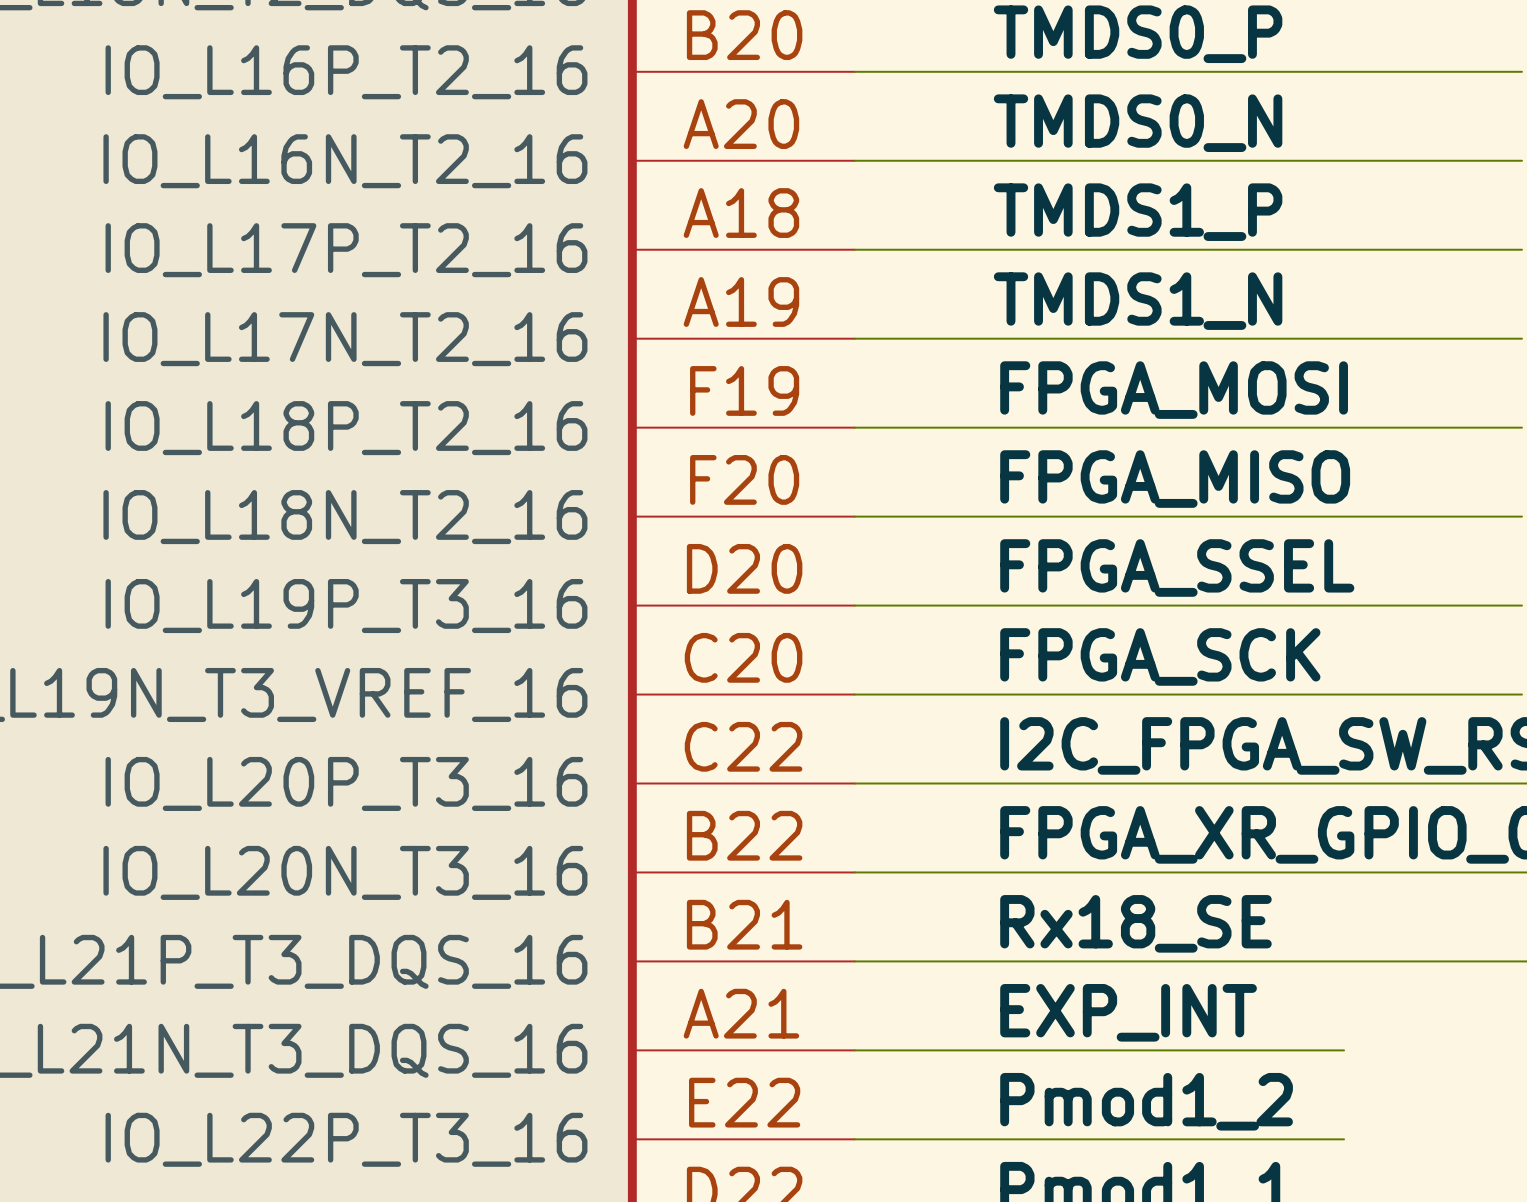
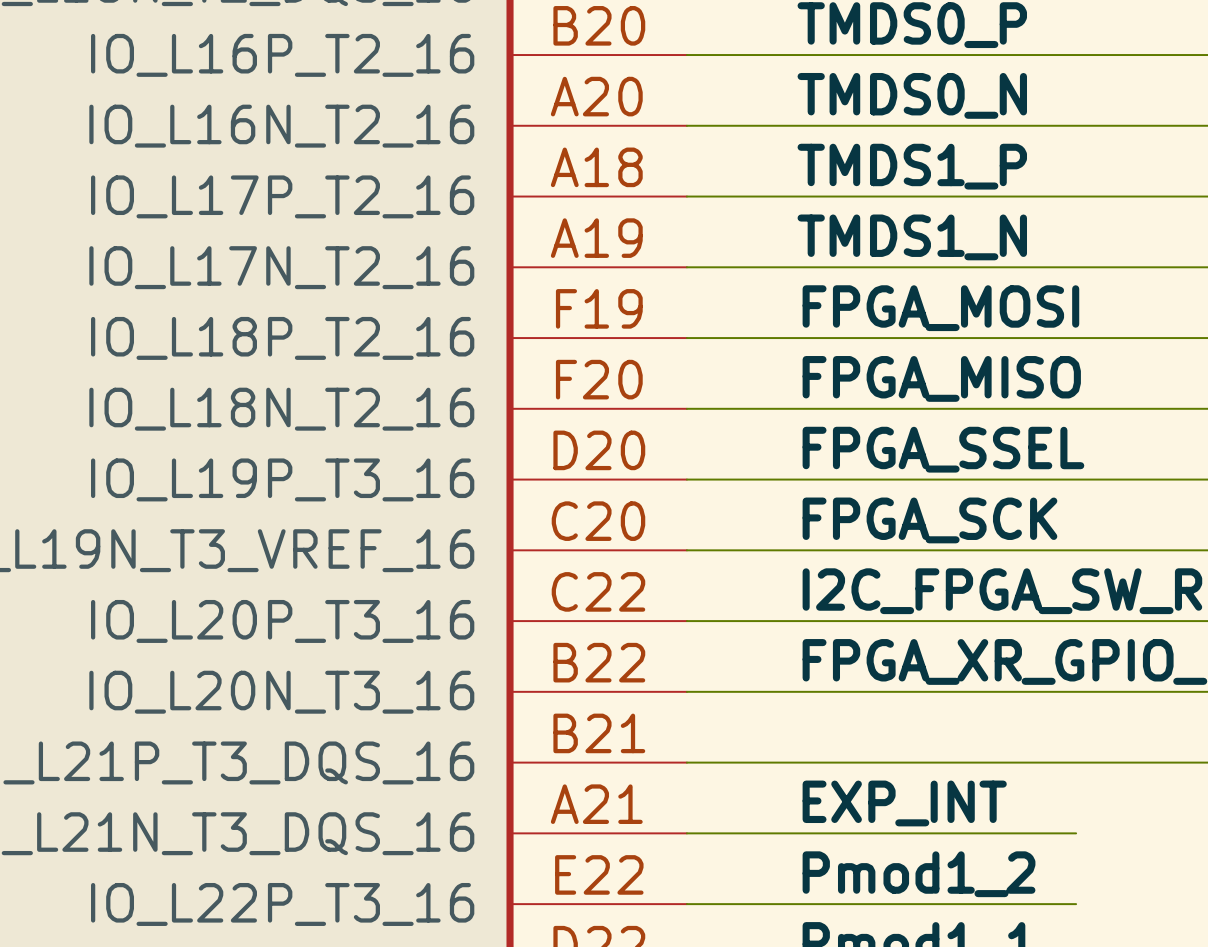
label: Rx18_SE (1135, 923) -> none

